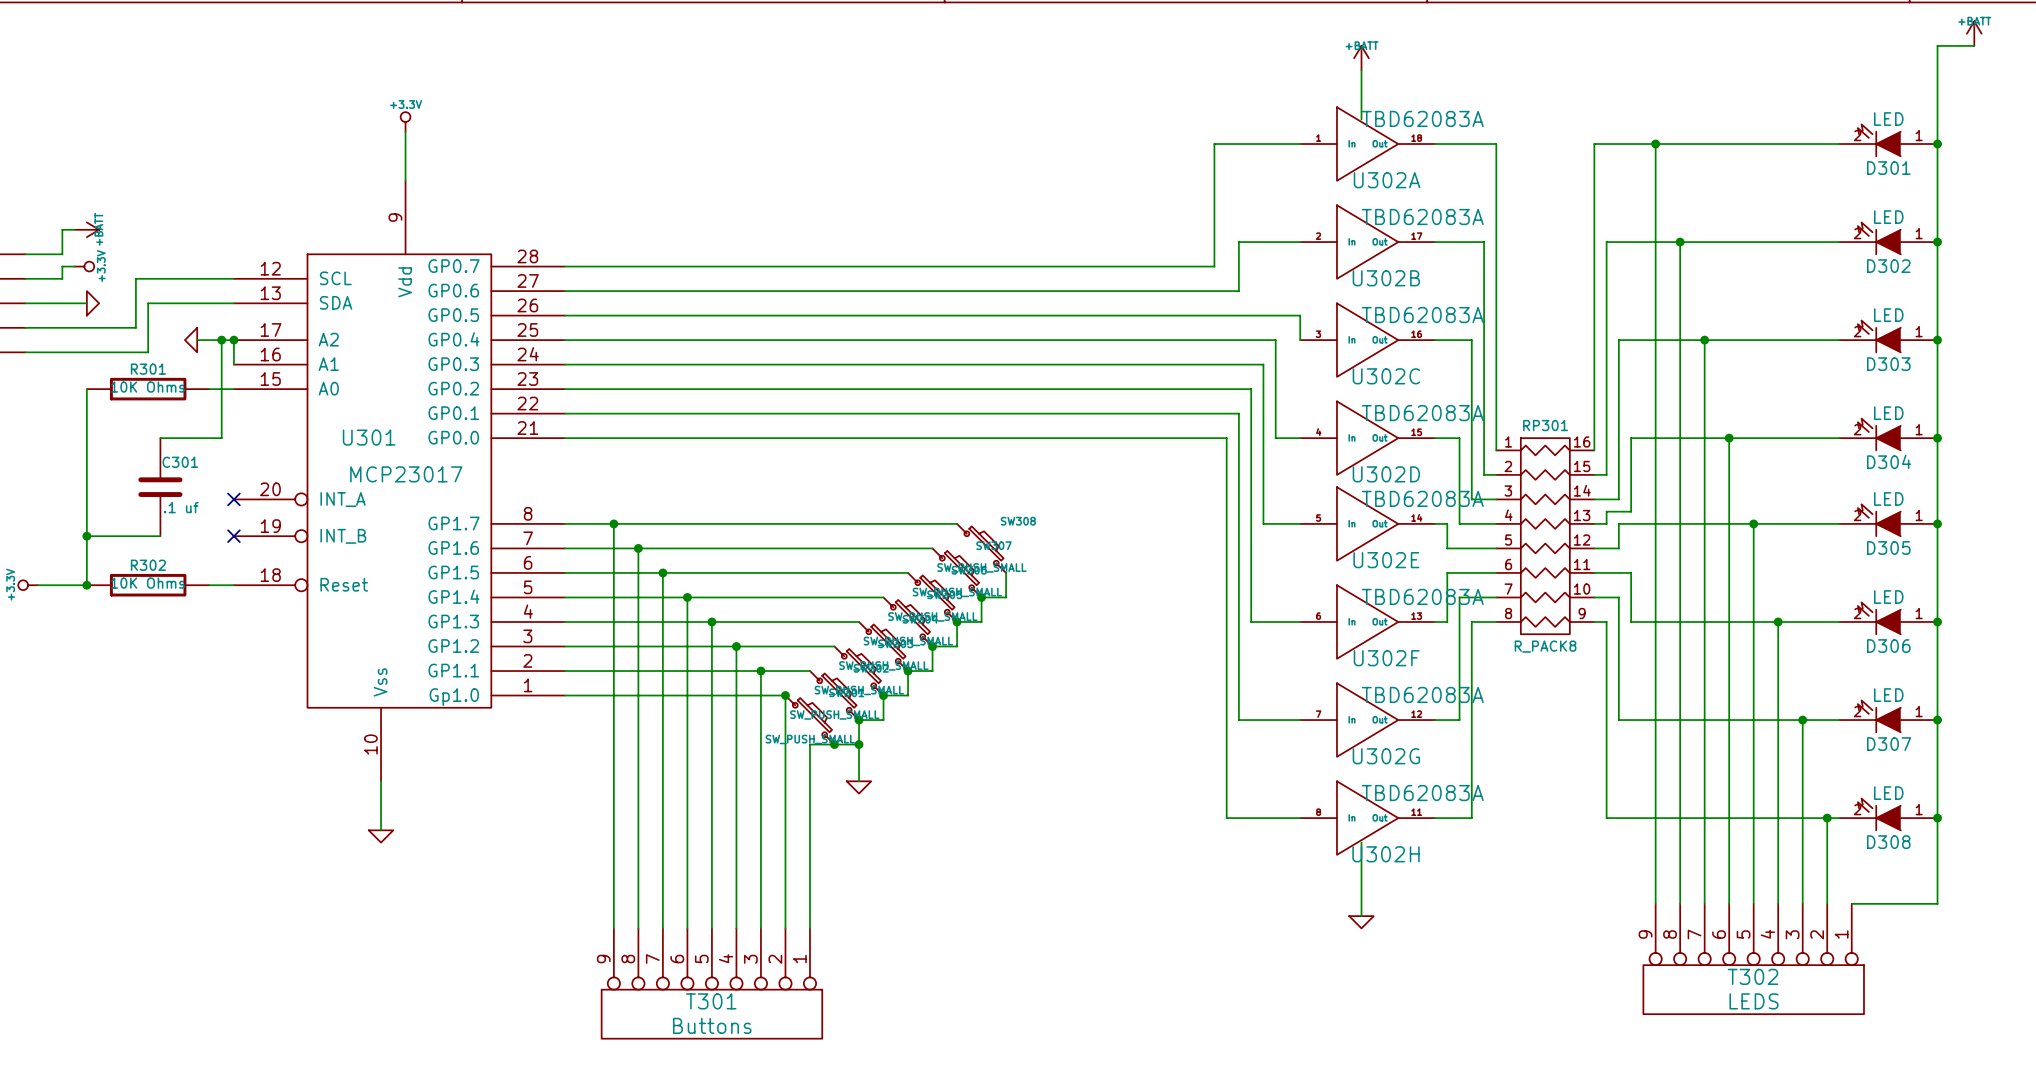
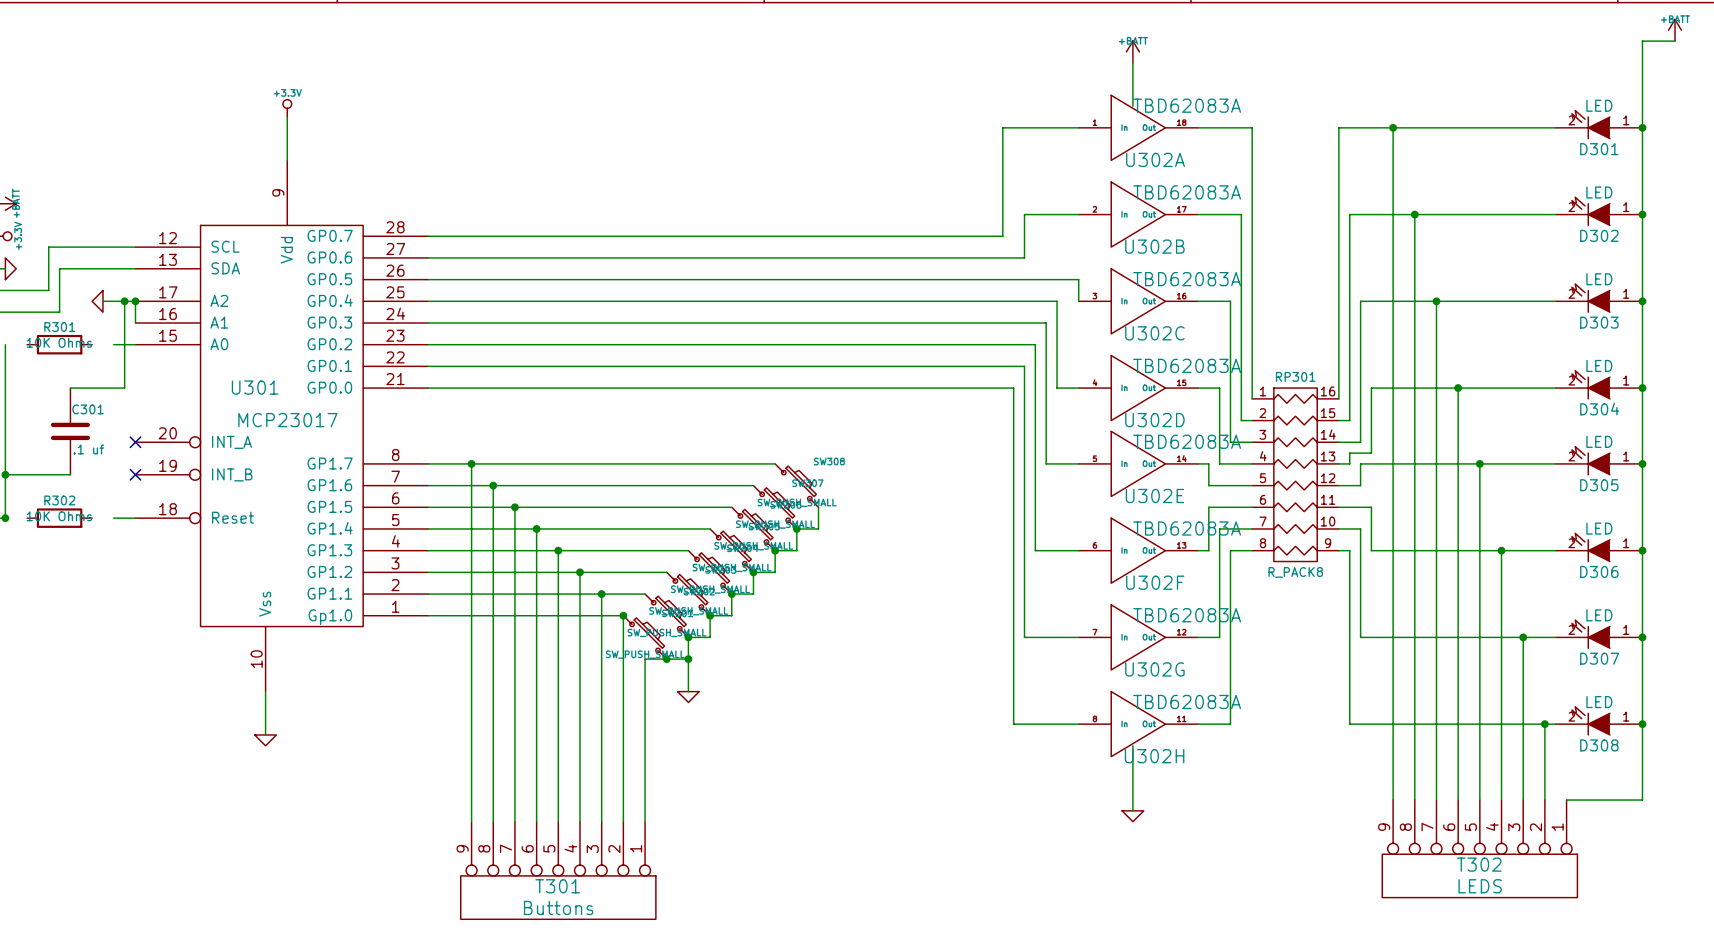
R301 symbol: [86, 377, 210, 401] -> [27, 334, 93, 355]
R302 symbol: [86, 573, 210, 597] -> [27, 508, 93, 528]

